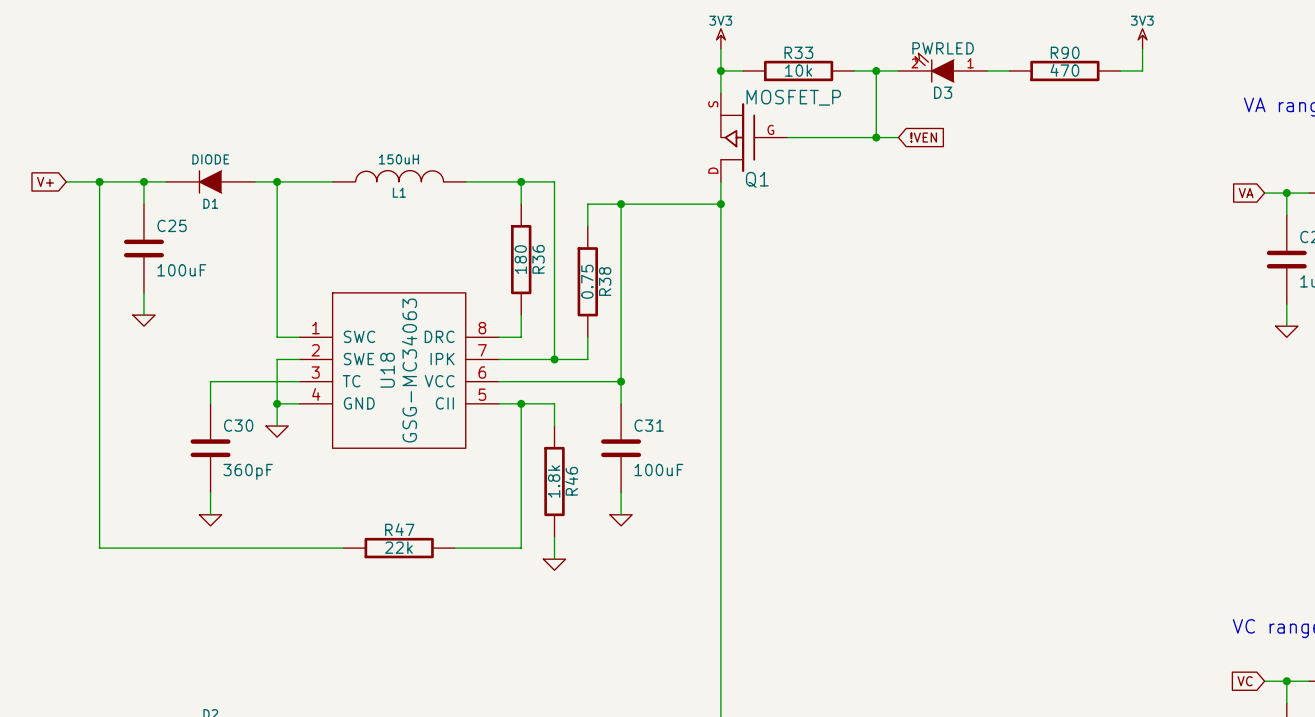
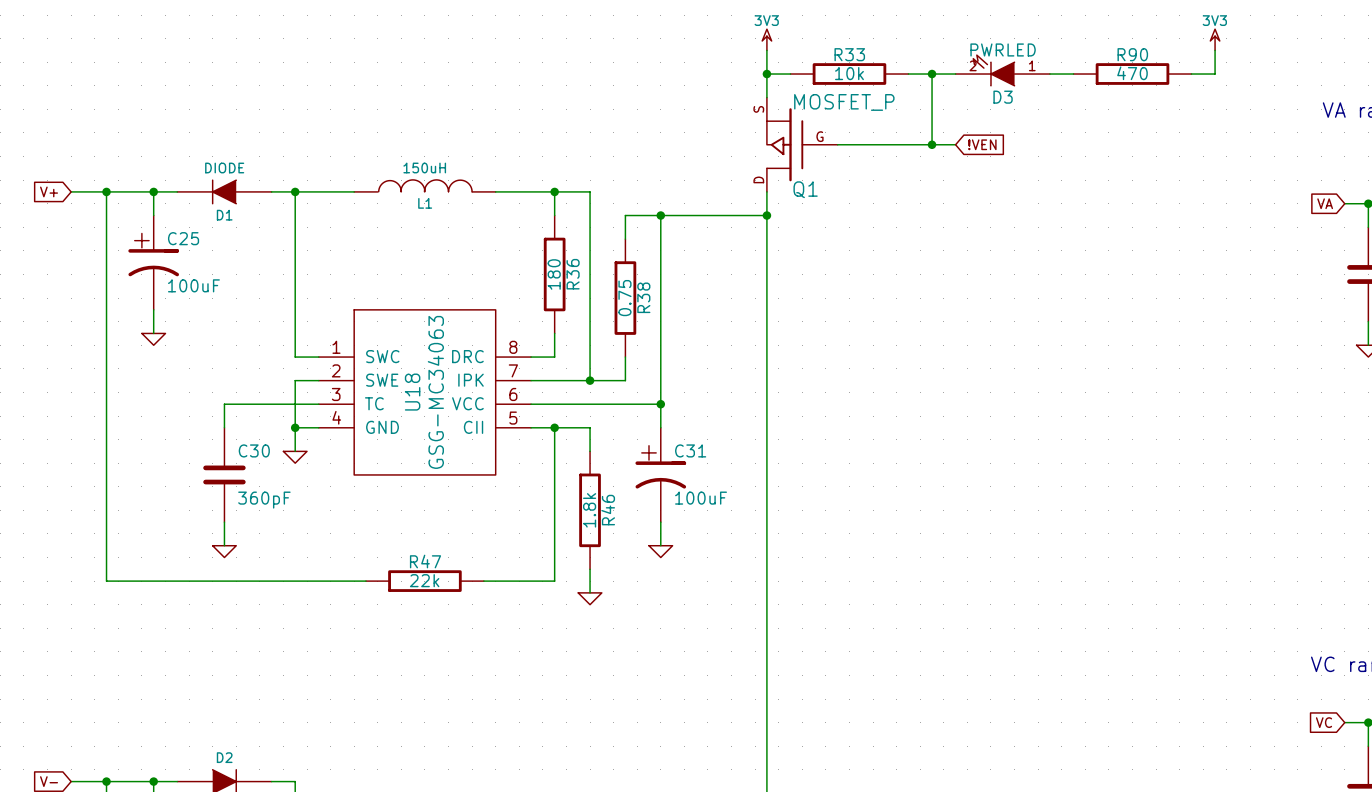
C25 symbol: [124, 204, 164, 293] -> [128, 215, 180, 310]
C31 symbol: [601, 403, 642, 493] -> [635, 427, 687, 523]

